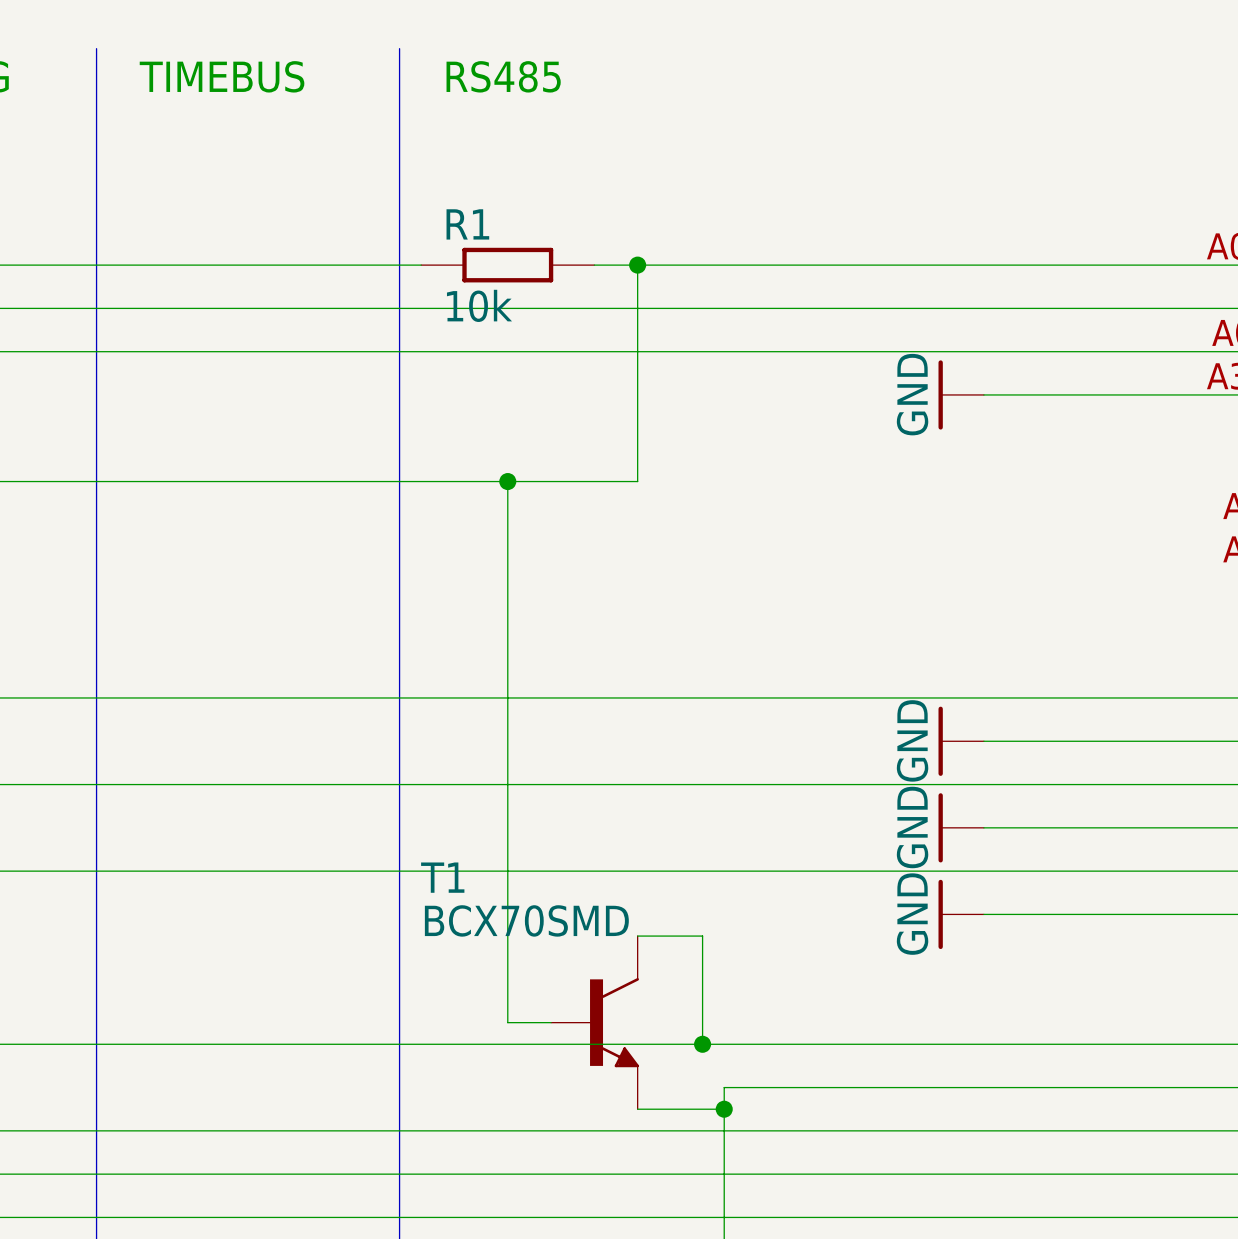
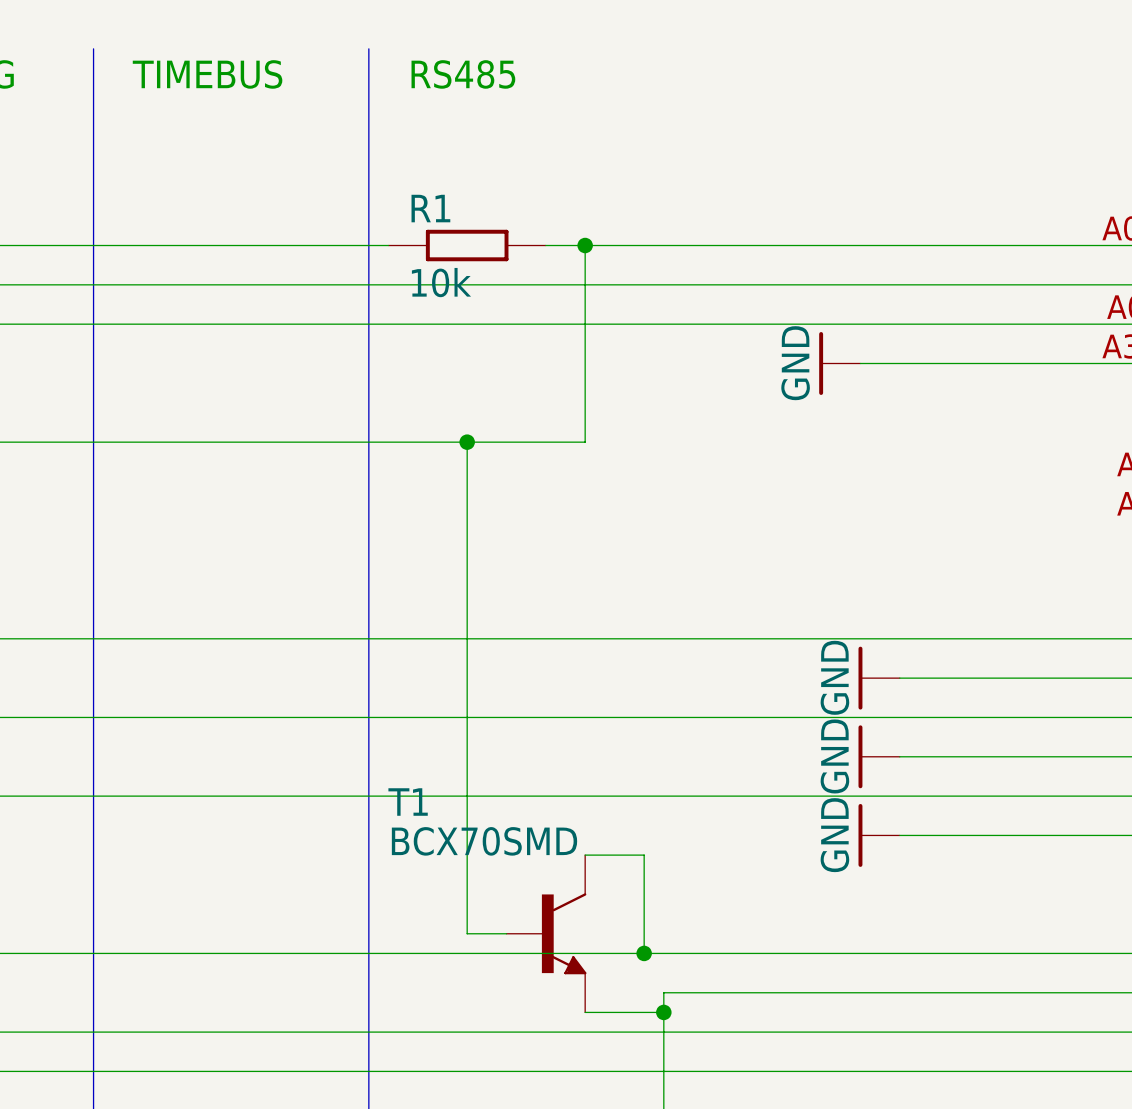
power symbol position: GND (961, 394) -> GND (839, 363)

